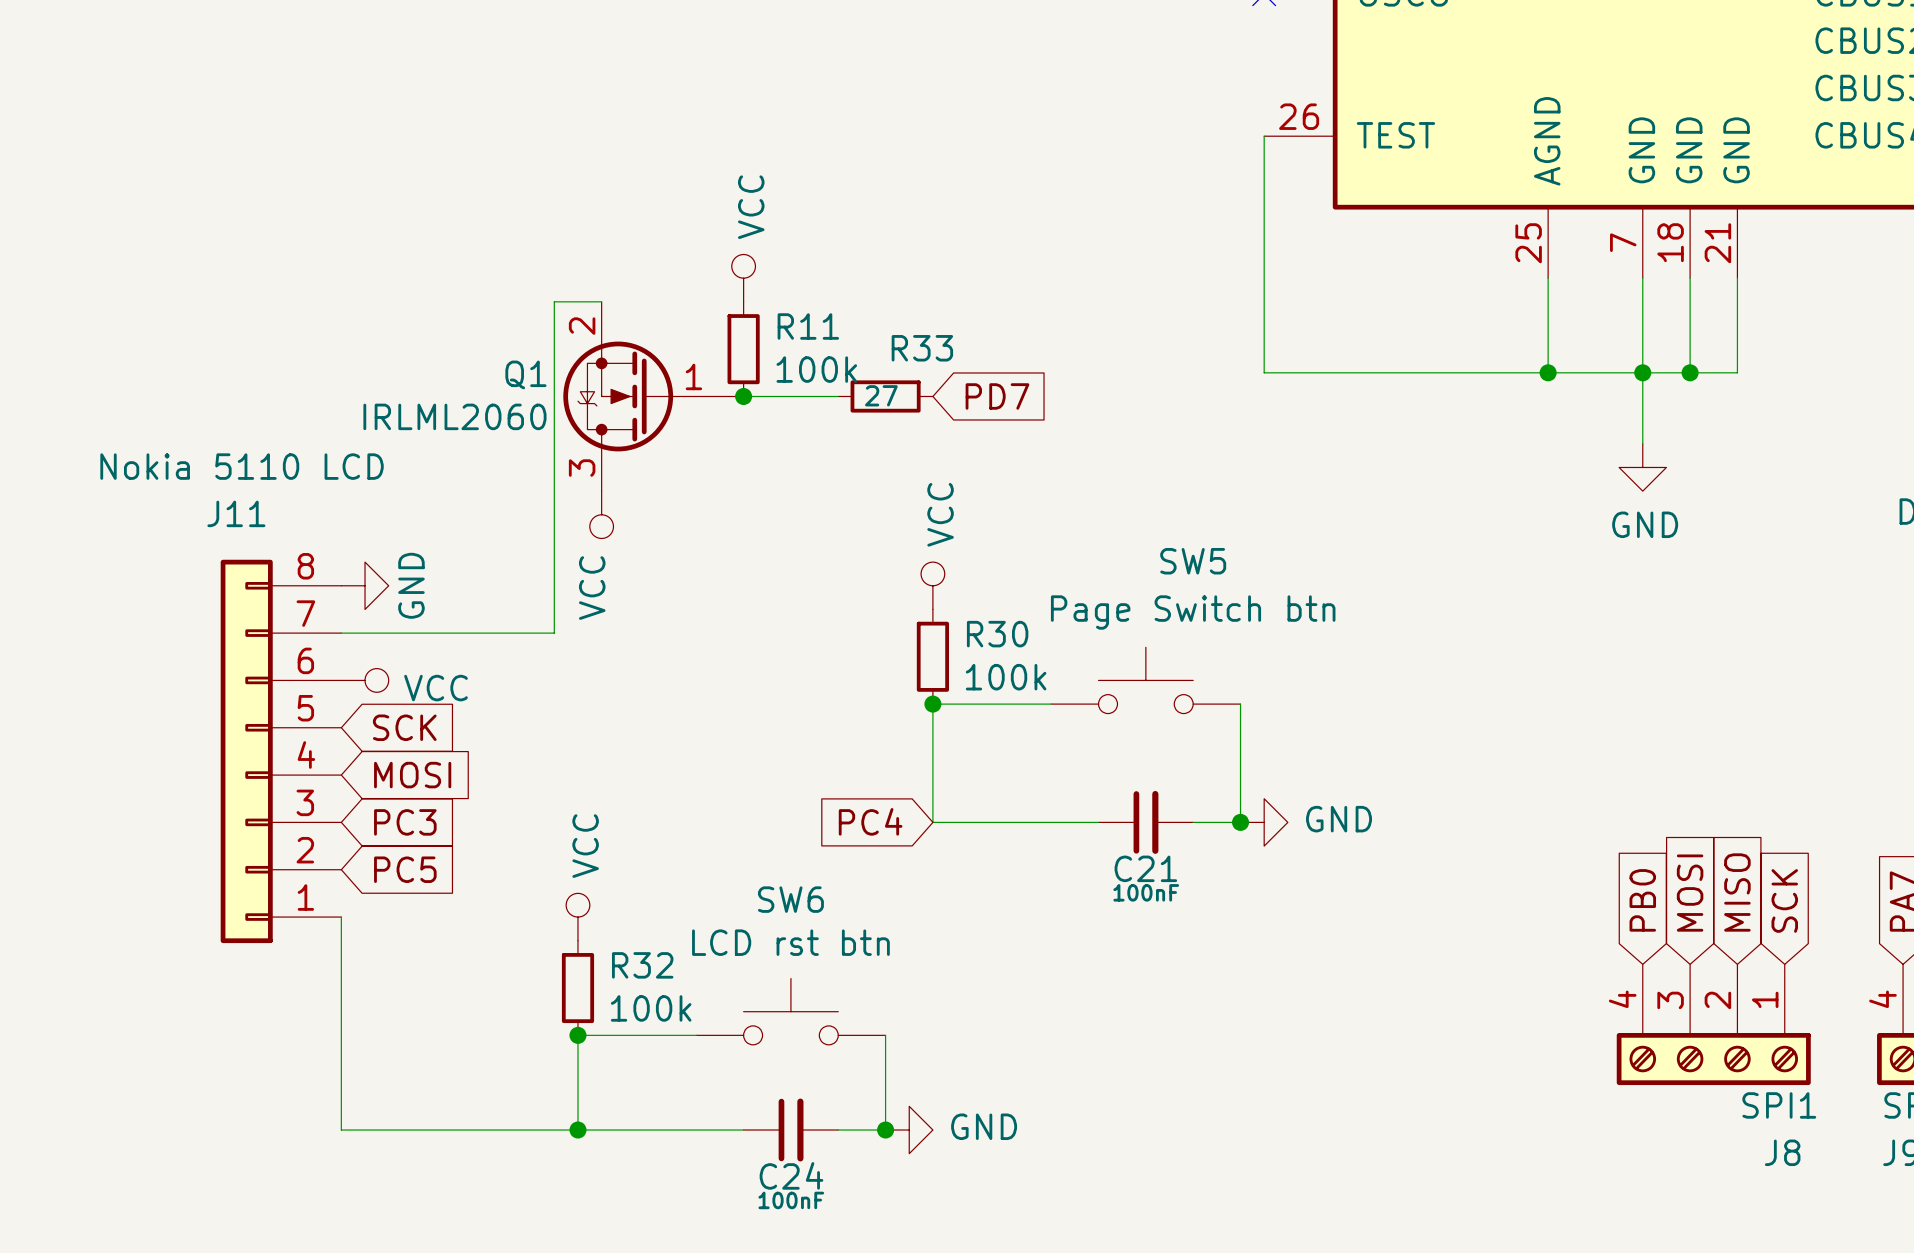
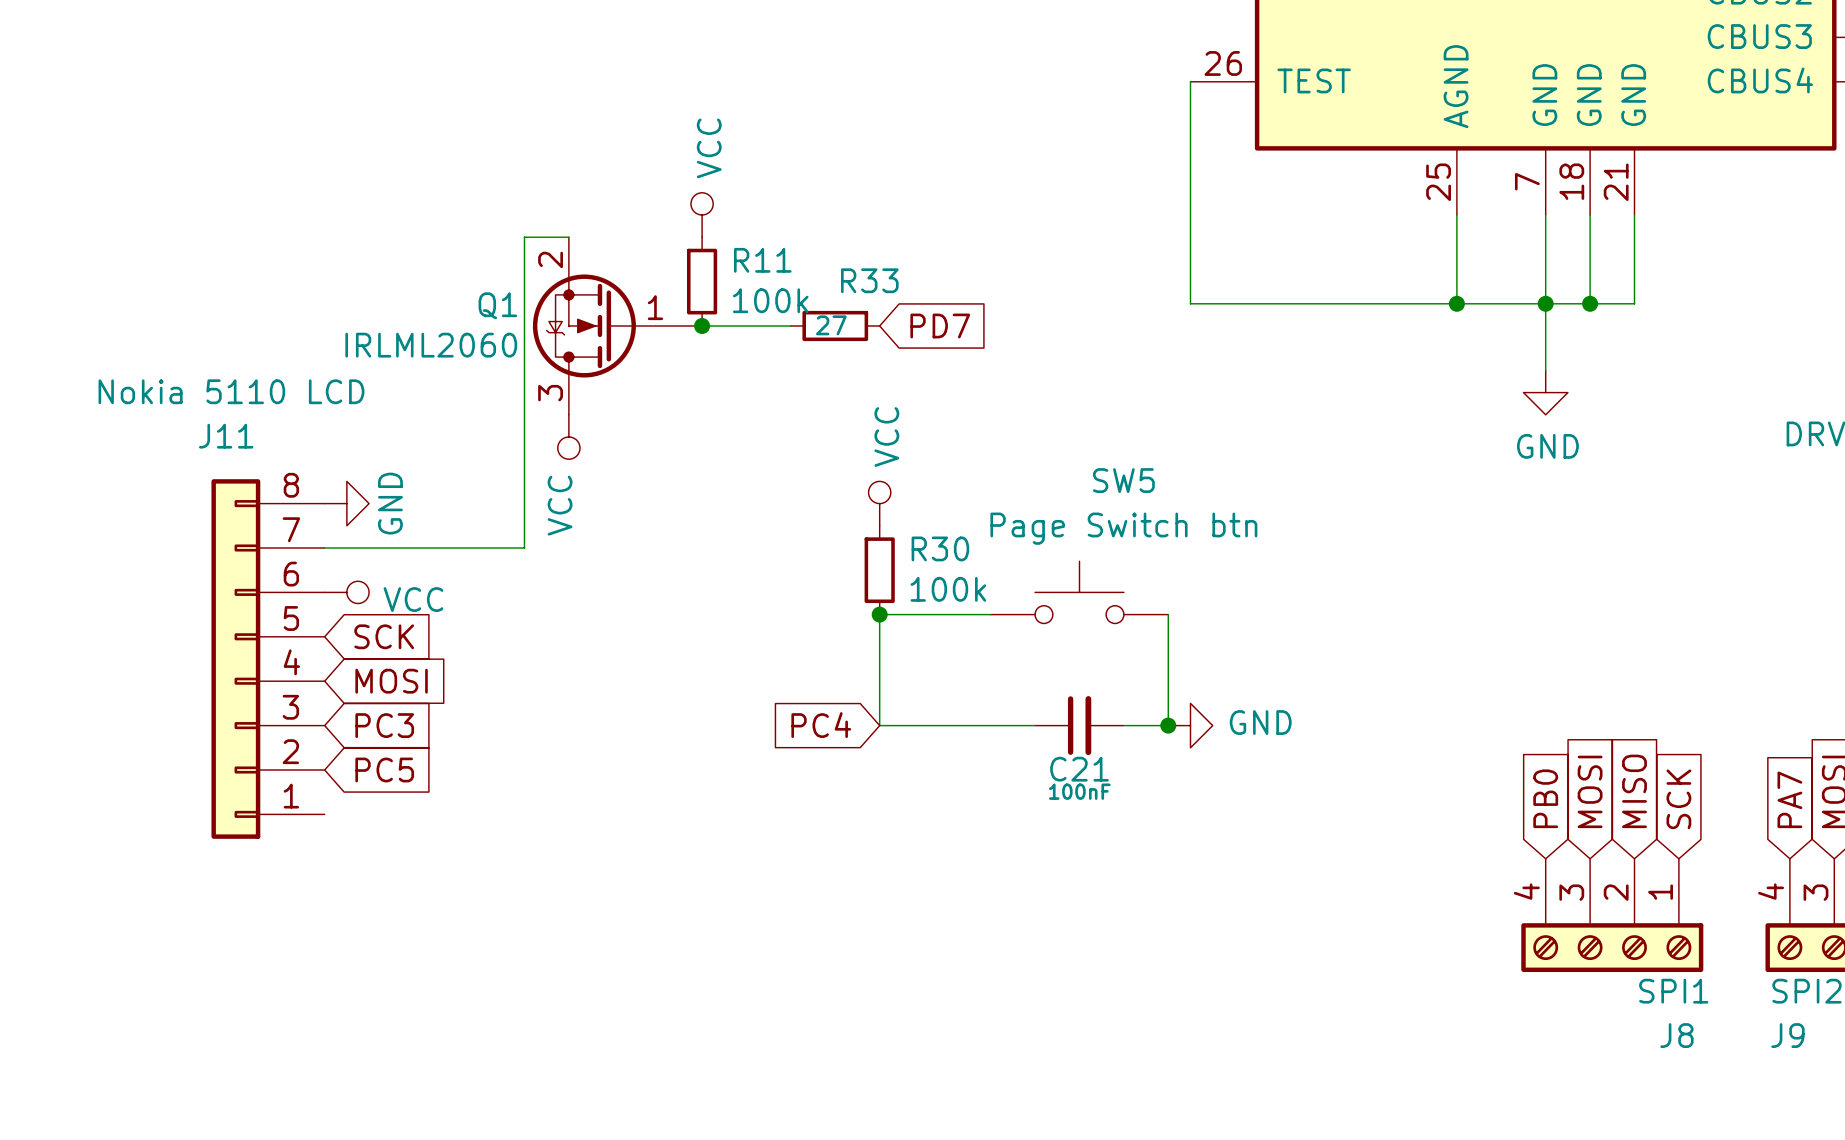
wire: (341, 917) (341, 1130) (743, 1130) -> none
power symbol: VCC (577, 917) -> none
R32: 100k (577, 988) -> none
SW6: LCD rst btn (790, 1011) -> none
junction: (577, 1035) -> none
wire: (696, 1035) (577, 1035) (577, 1130) -> none
wire: (885, 1035) (885, 1130) (838, 1130) -> none
junction: (577, 1130) -> none
C24: 100nF (790, 1130) -> none
junction: (885, 1130) -> none
power symbol: GND (909, 1130) -> none

